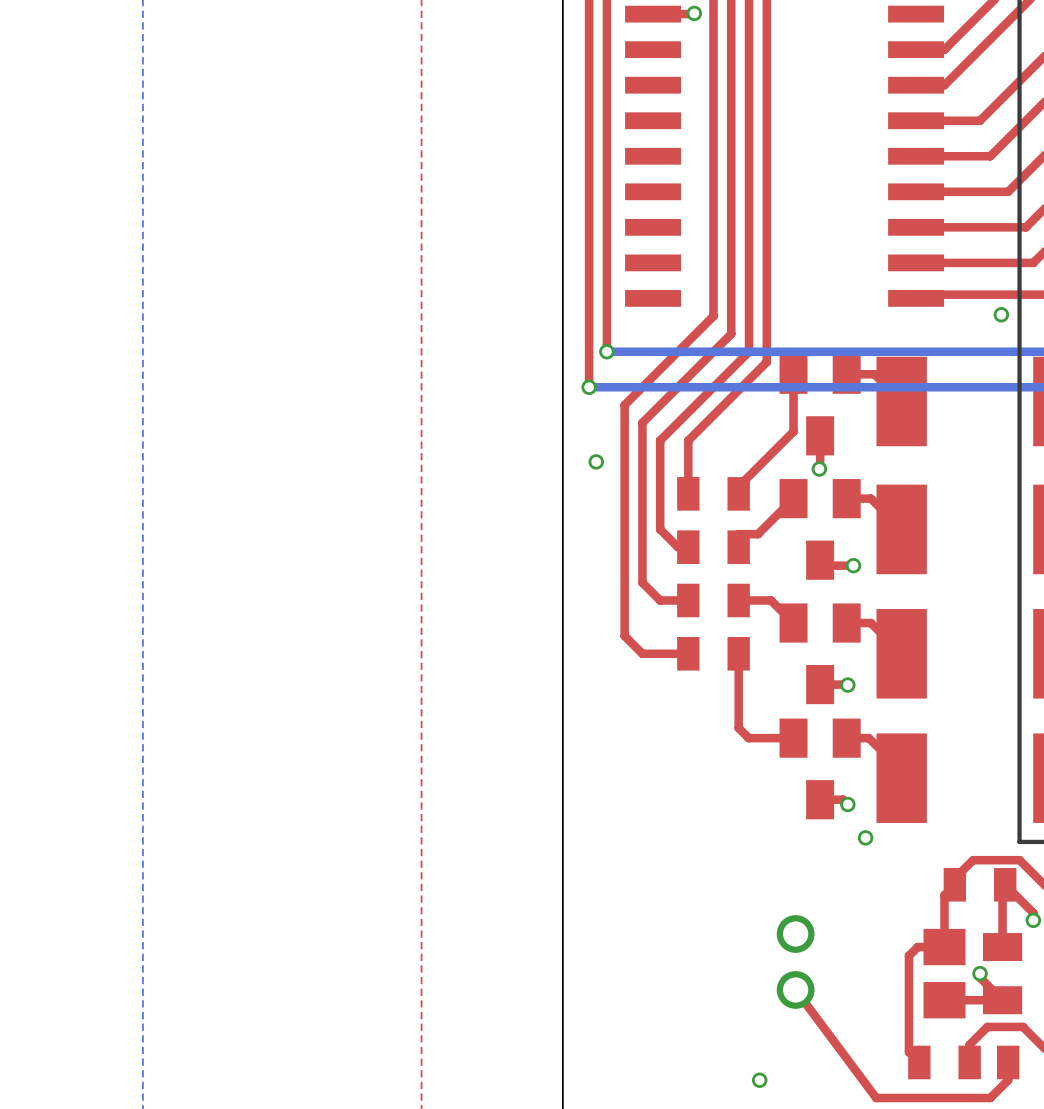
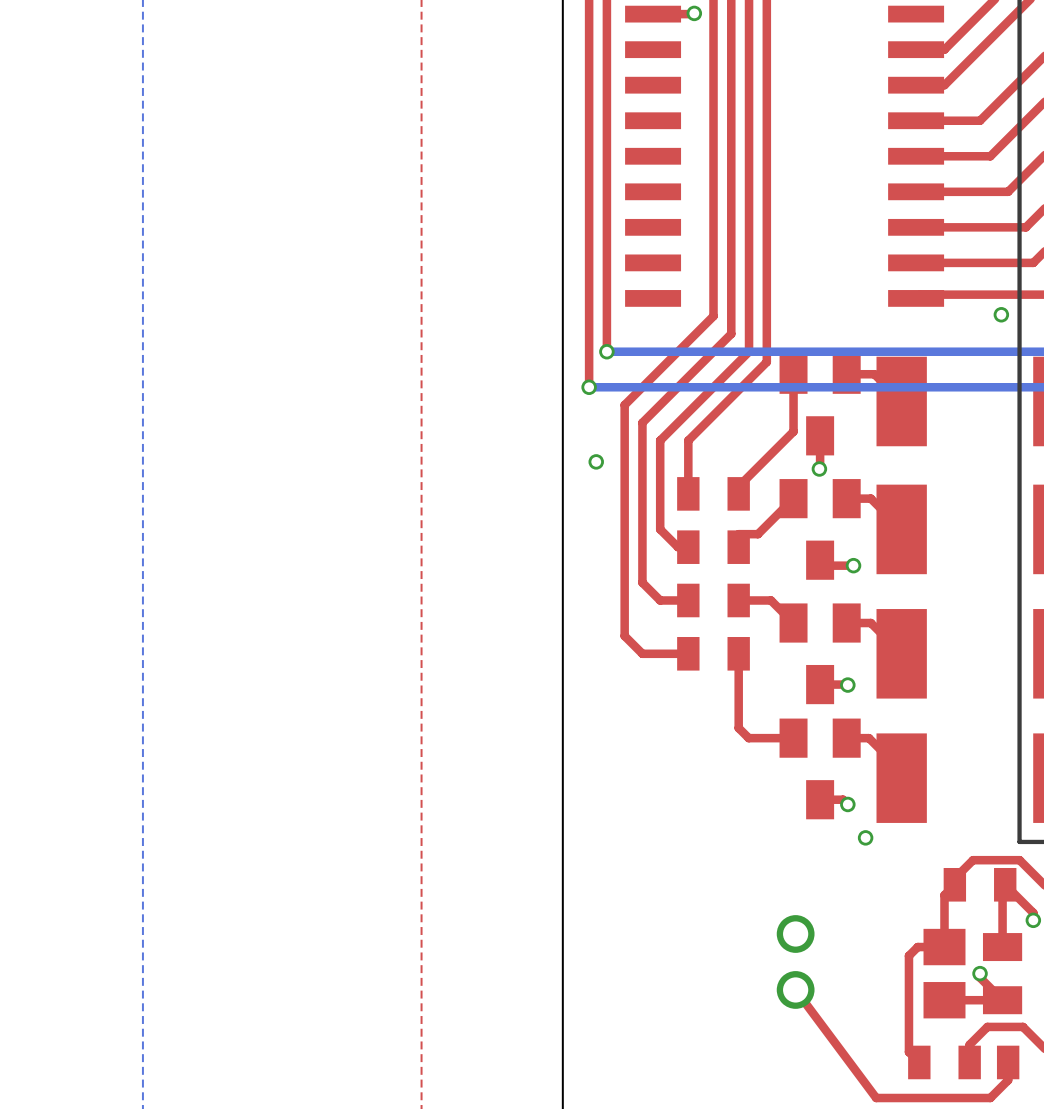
via: (759, 1080) -> none

